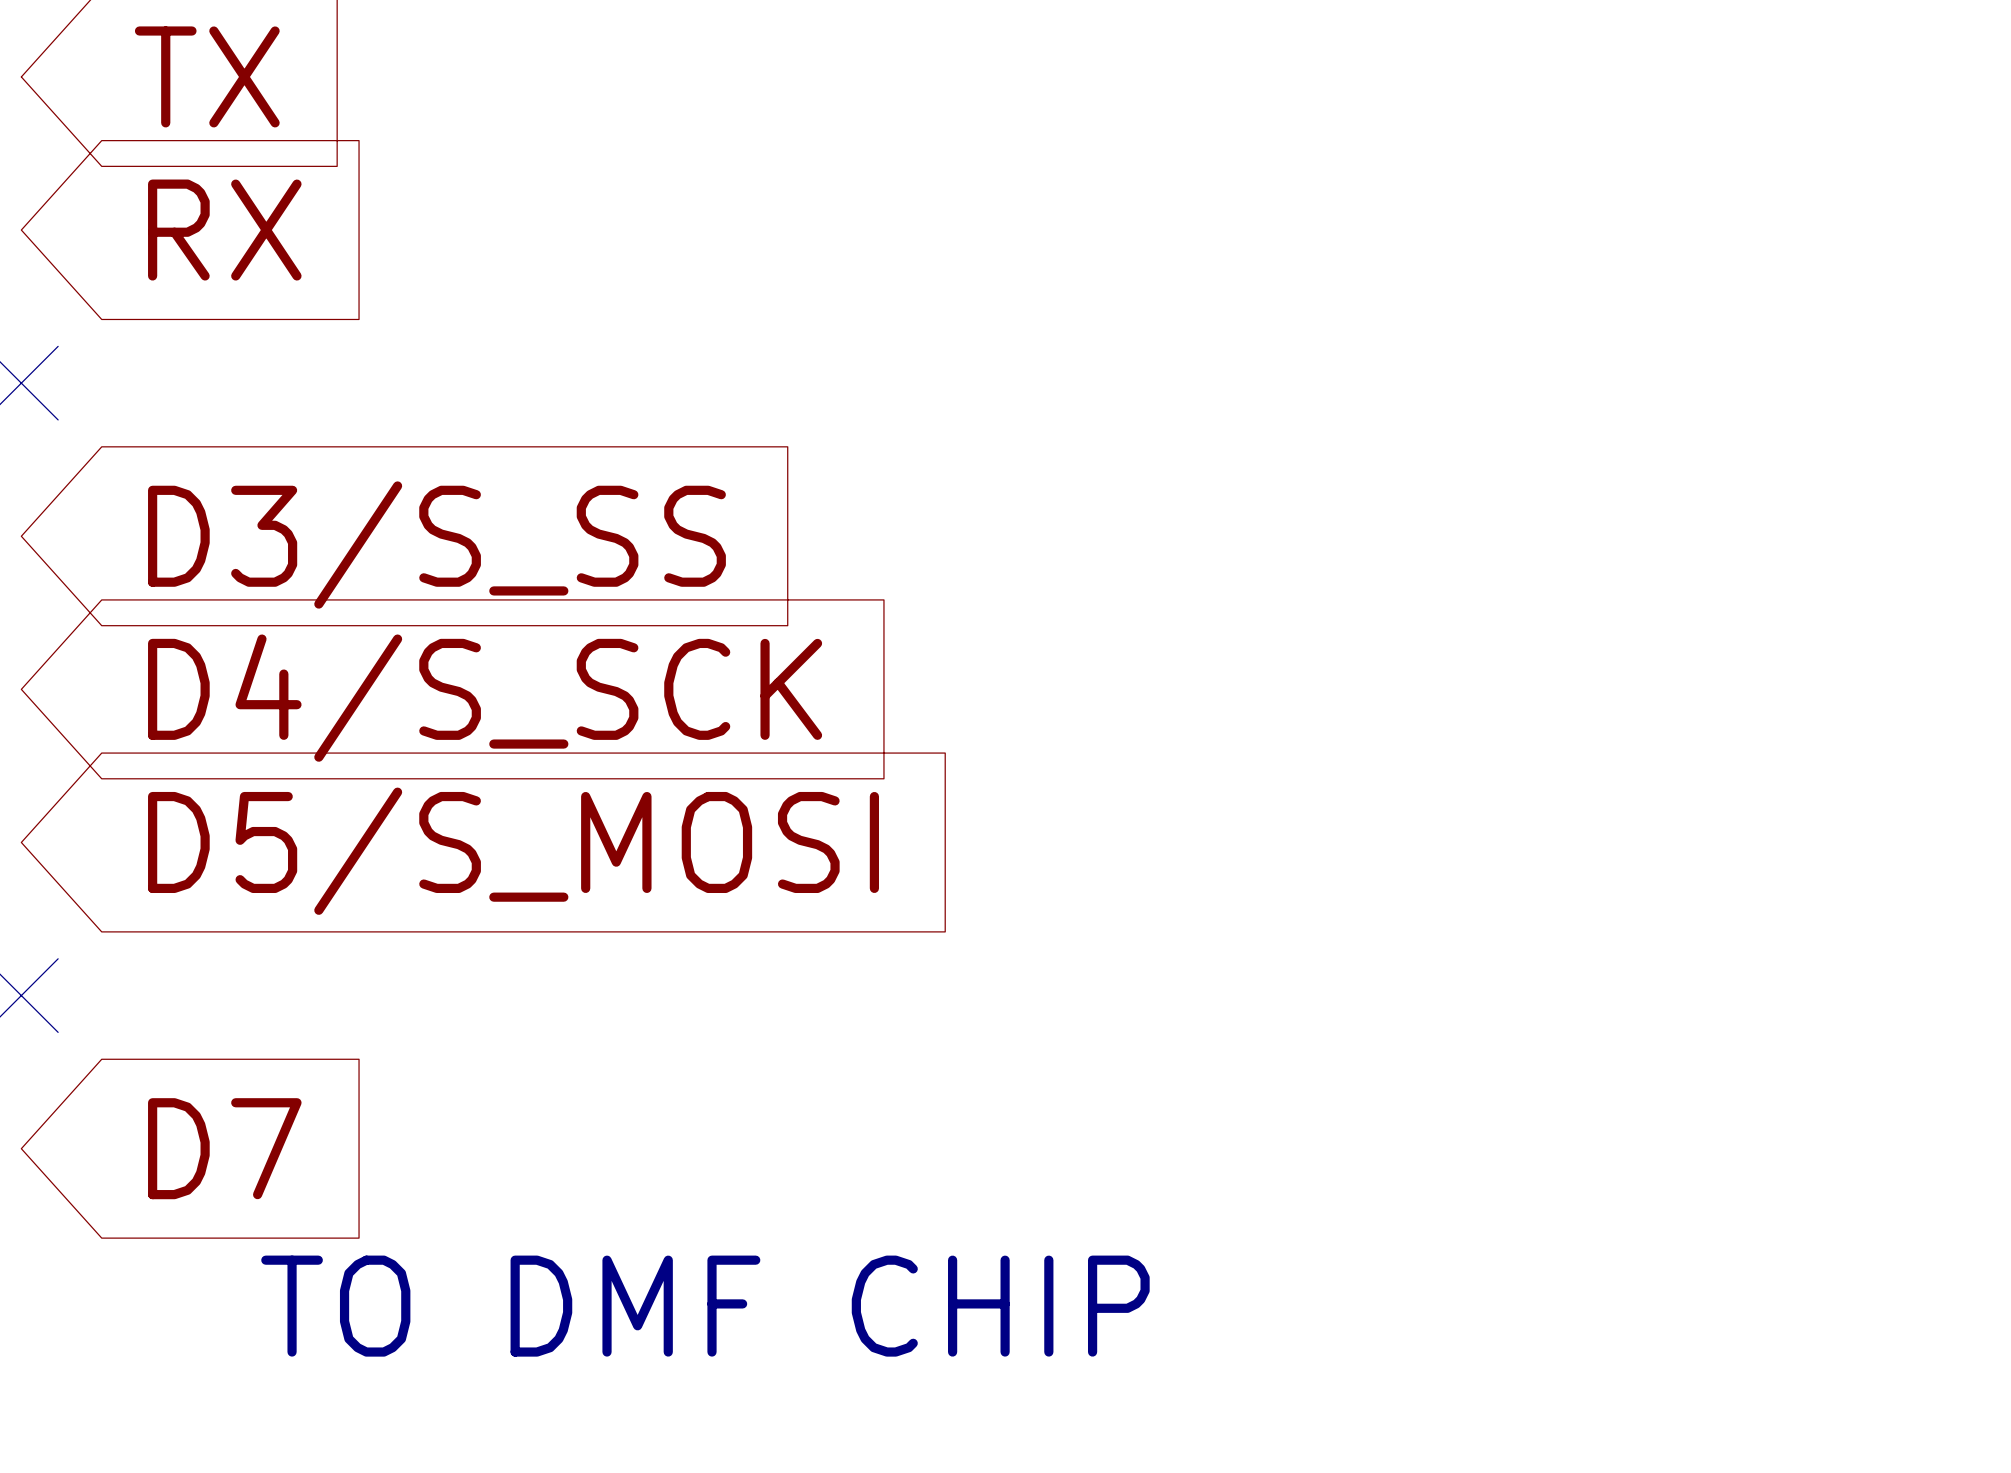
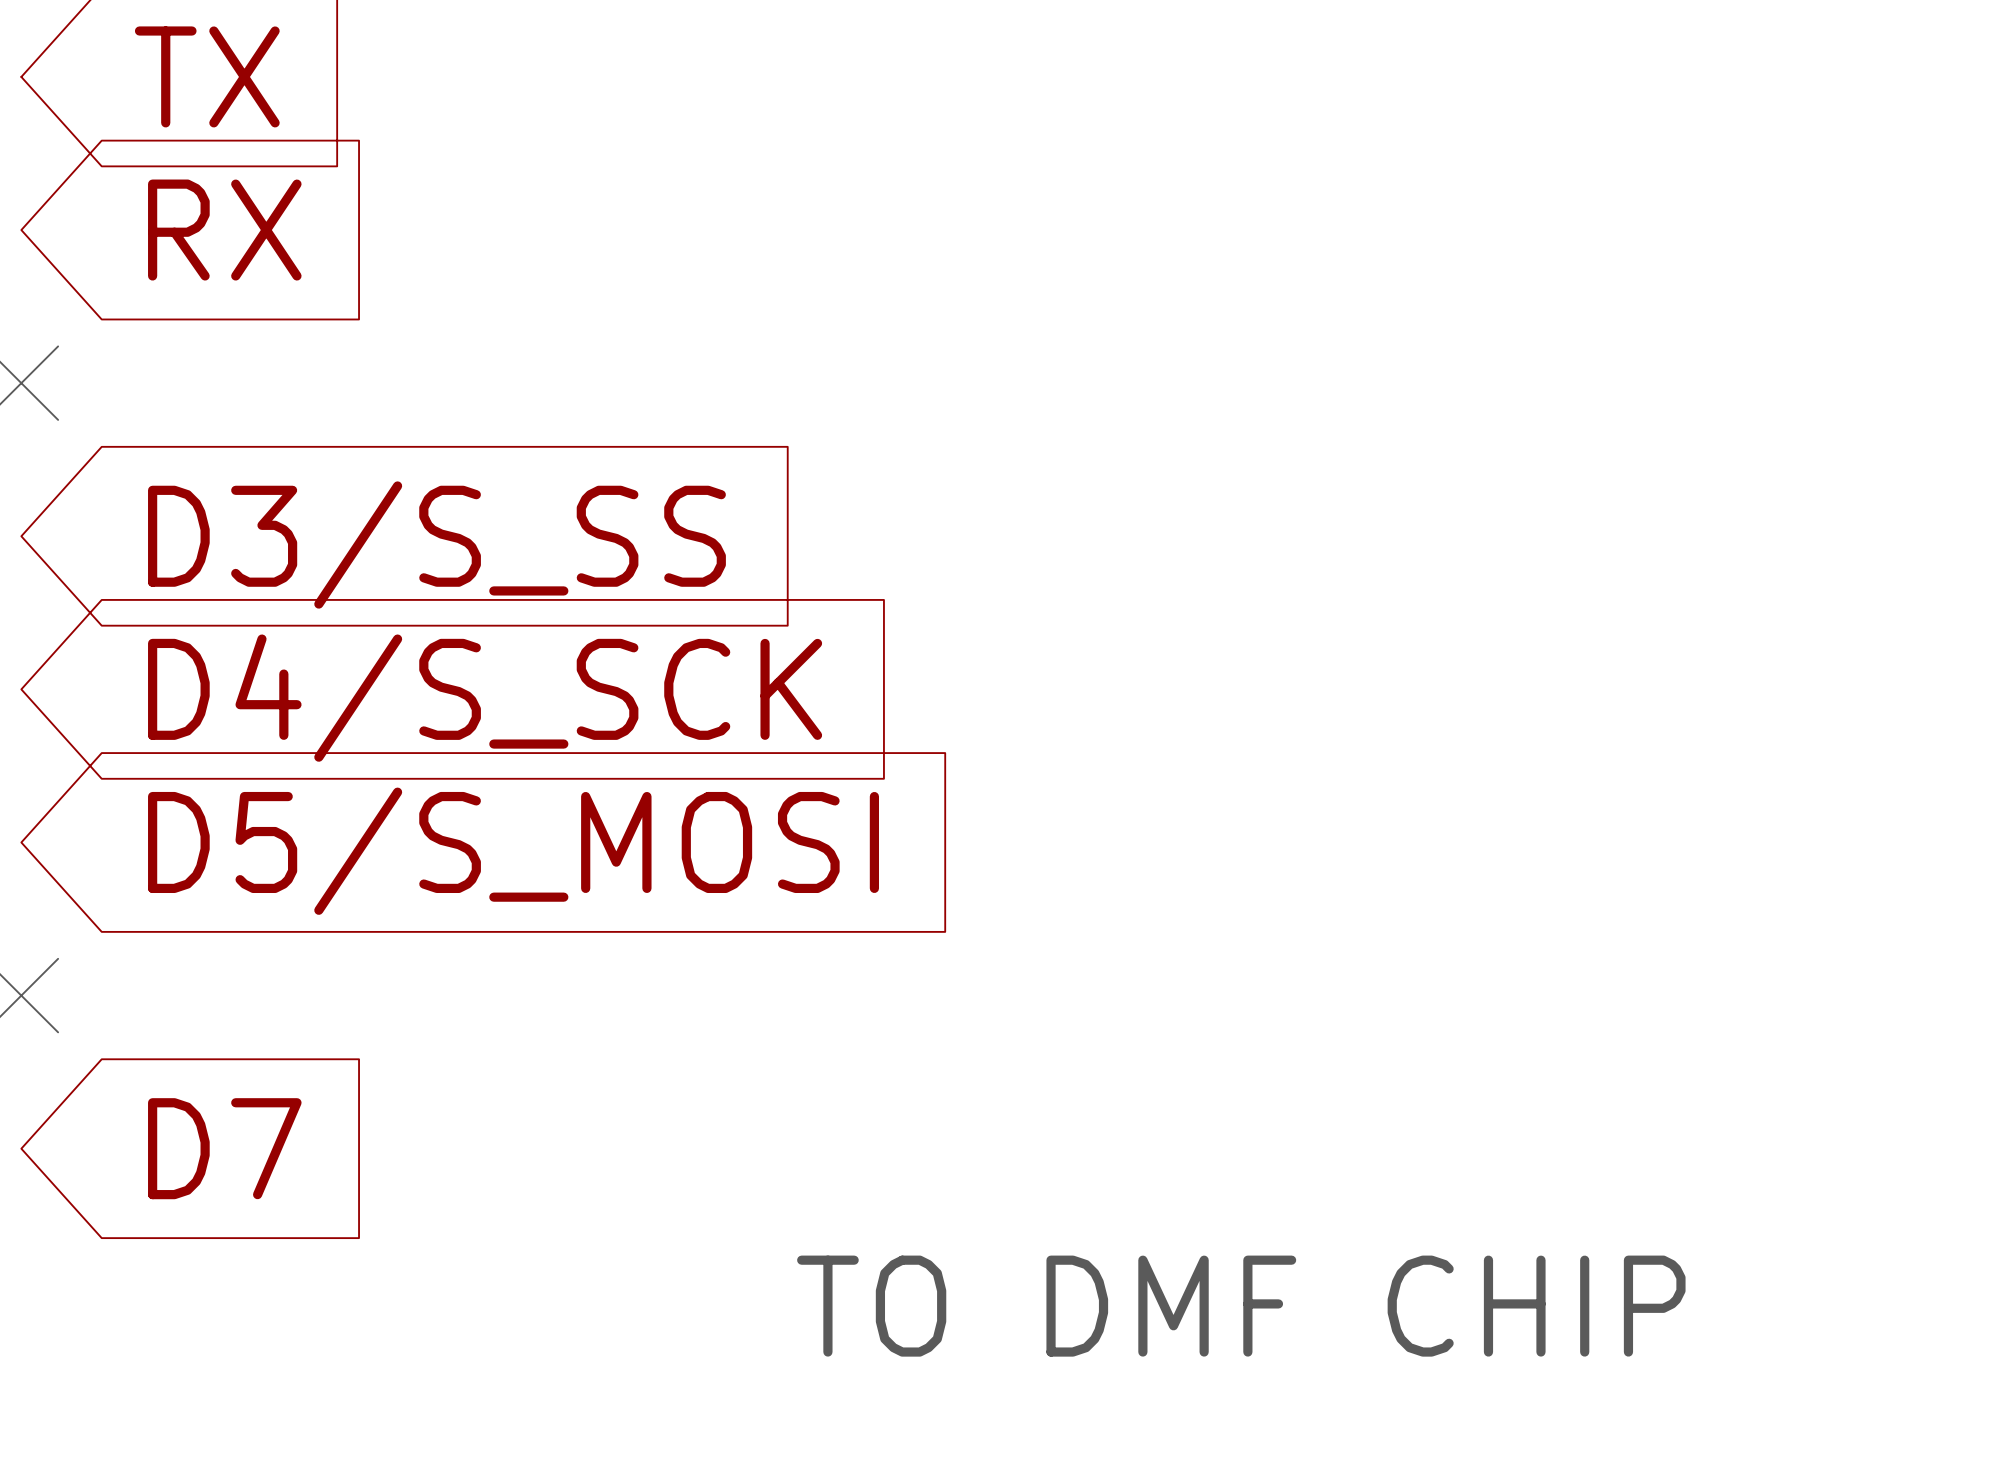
text position: TO DMF CHIP (705, 1306) -> TO DMF CHIP (1241, 1306)

